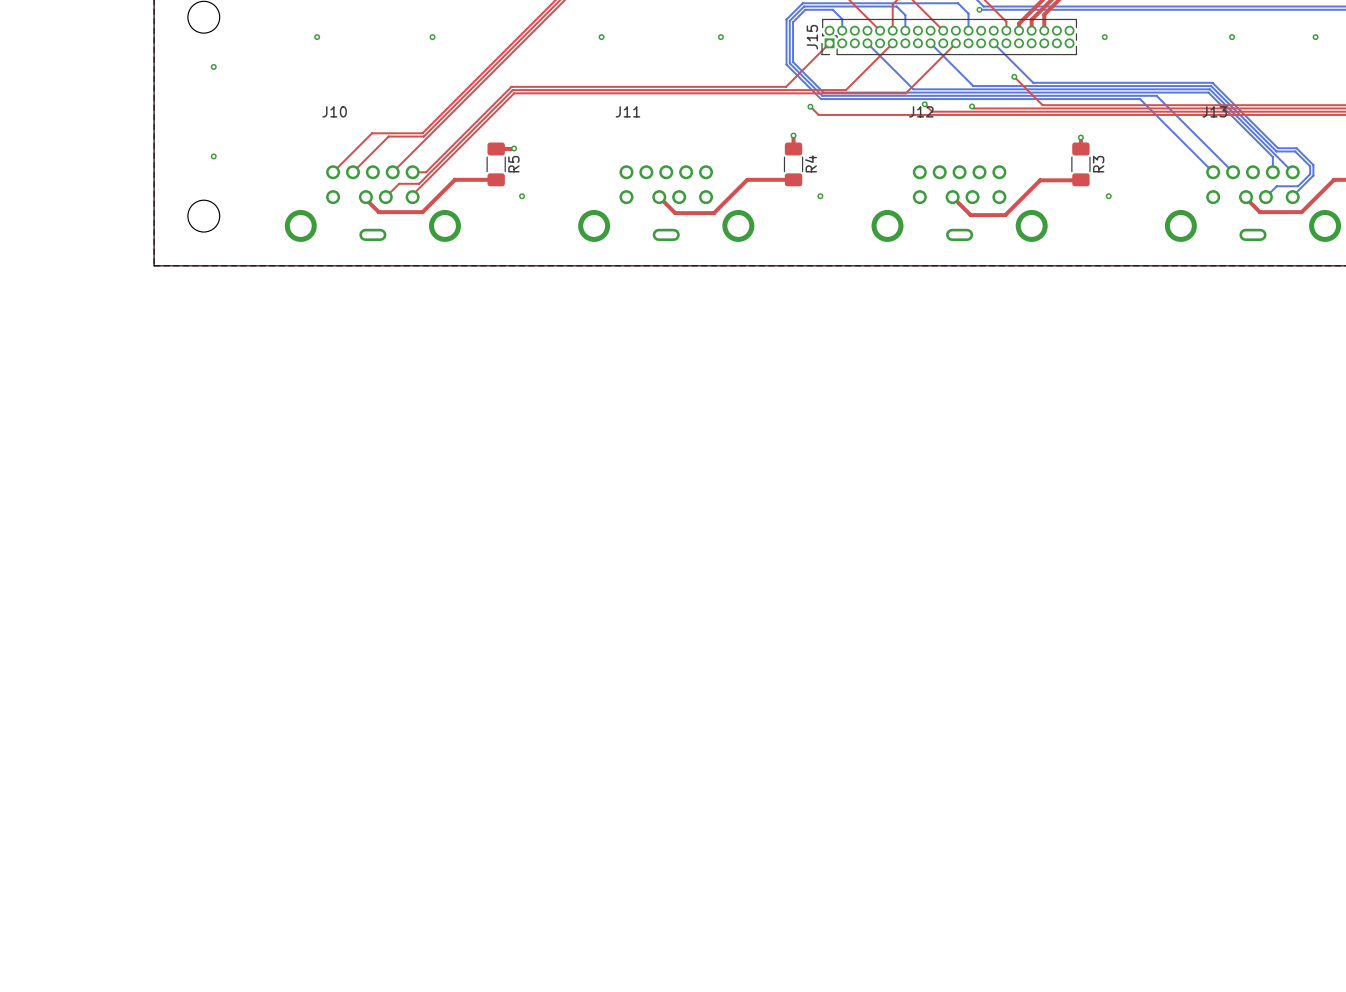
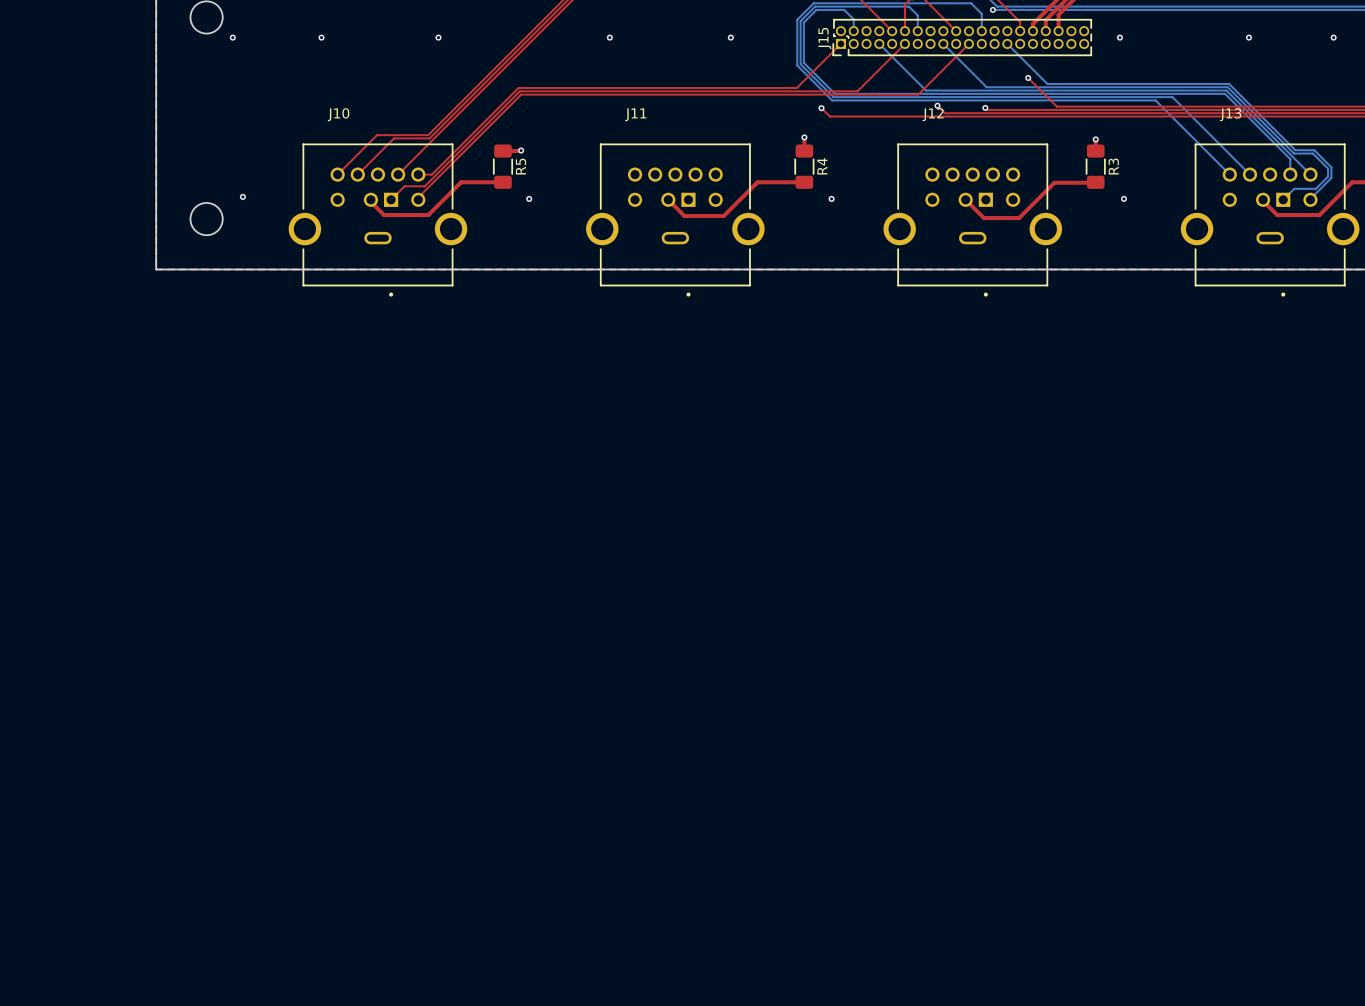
via position: (213, 66) -> (232, 37)
via position: (213, 156) -> (242, 196)
J10 footprint: [284, 165, 461, 242] -> [288, 143, 468, 297]
J11 footprint: [578, 165, 755, 242] -> [586, 143, 765, 297]
J12 footprint: [871, 165, 1048, 242] -> [883, 143, 1063, 297]
J13 footprint: [1164, 165, 1342, 242] -> [1180, 143, 1360, 297]

